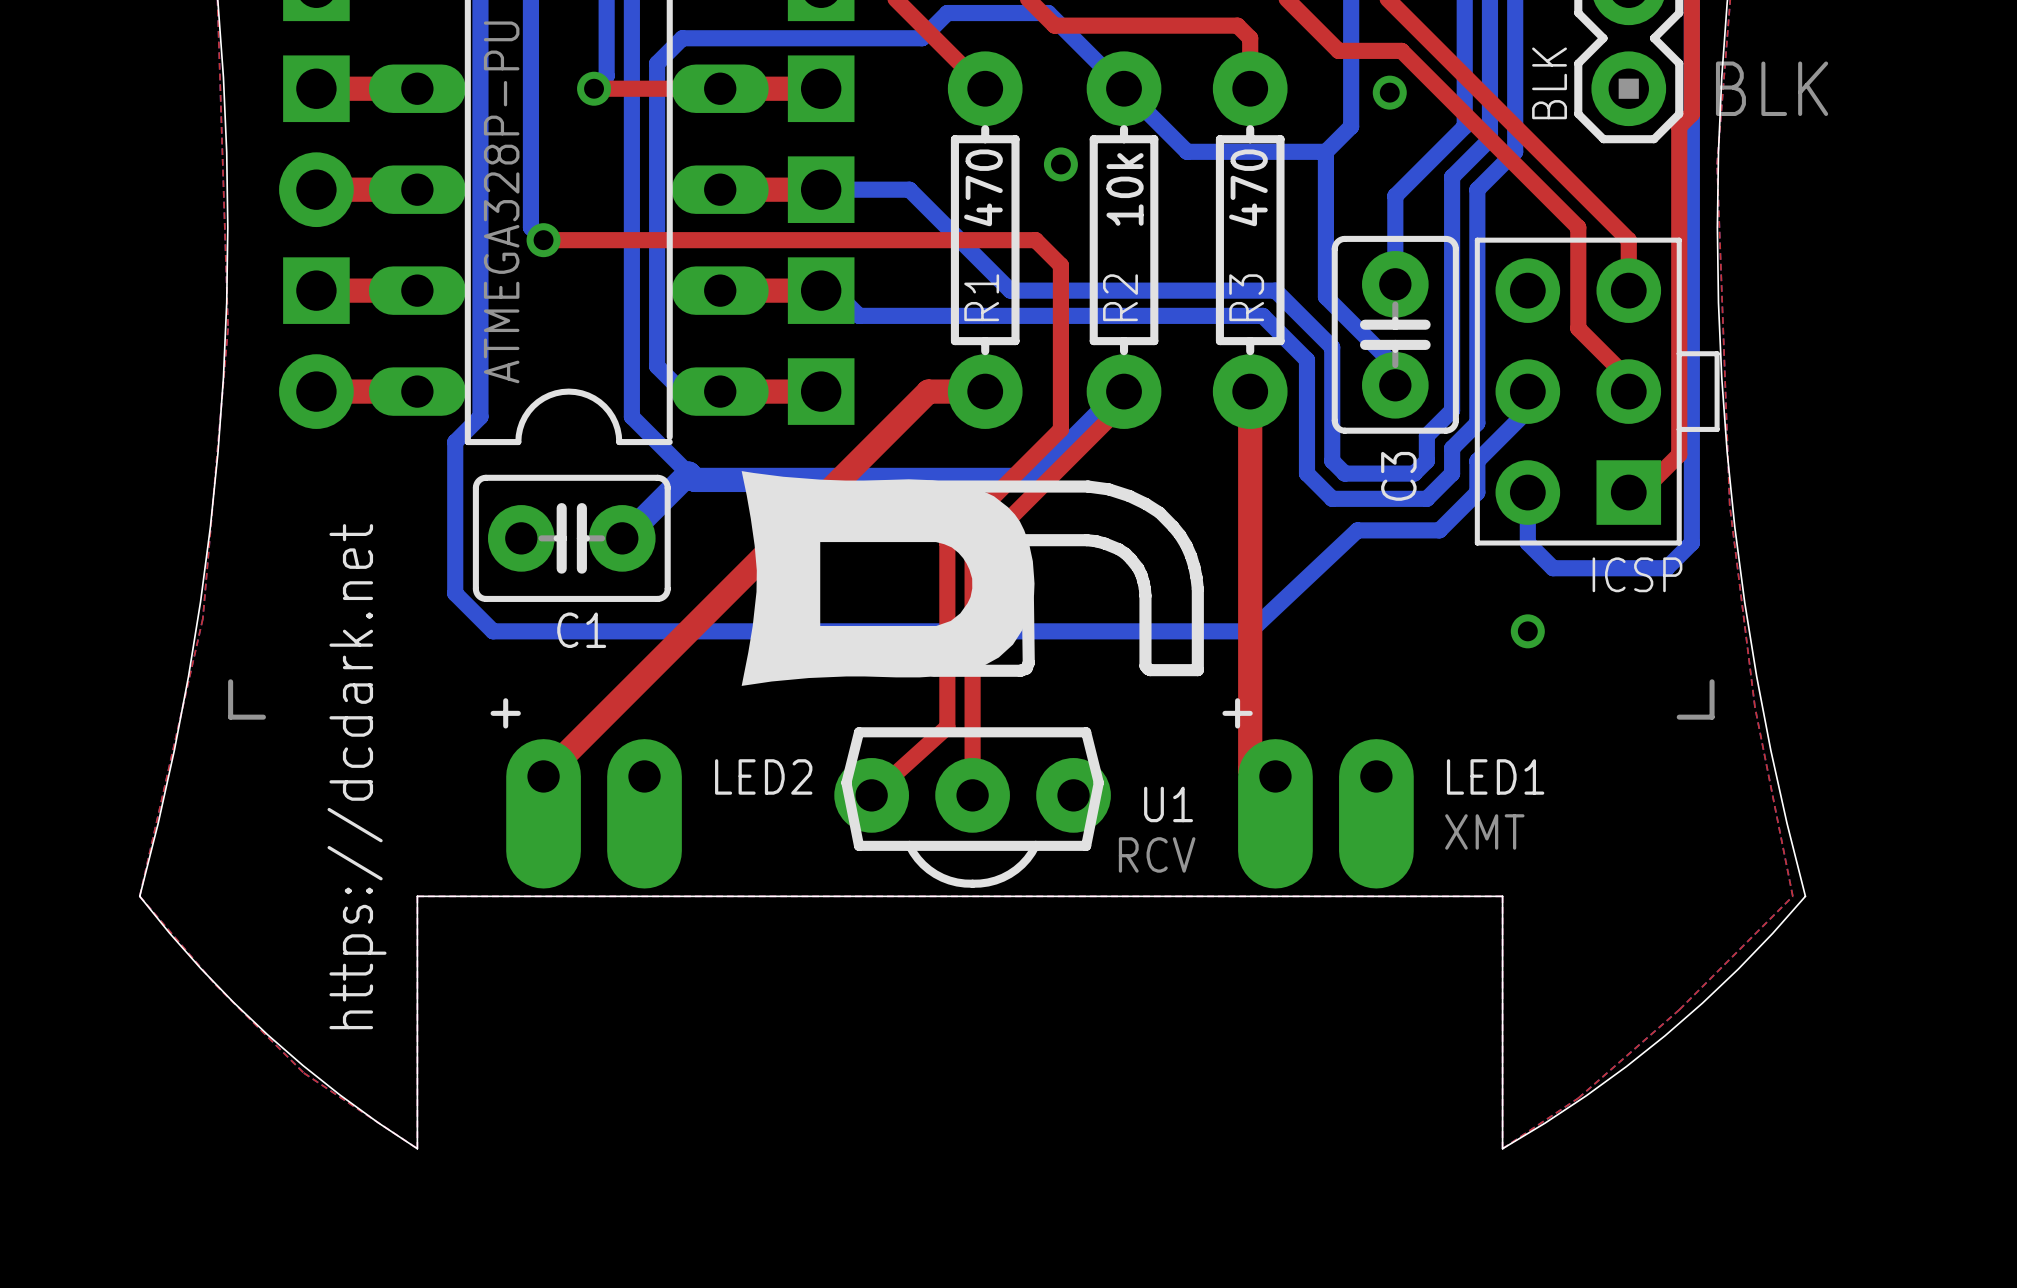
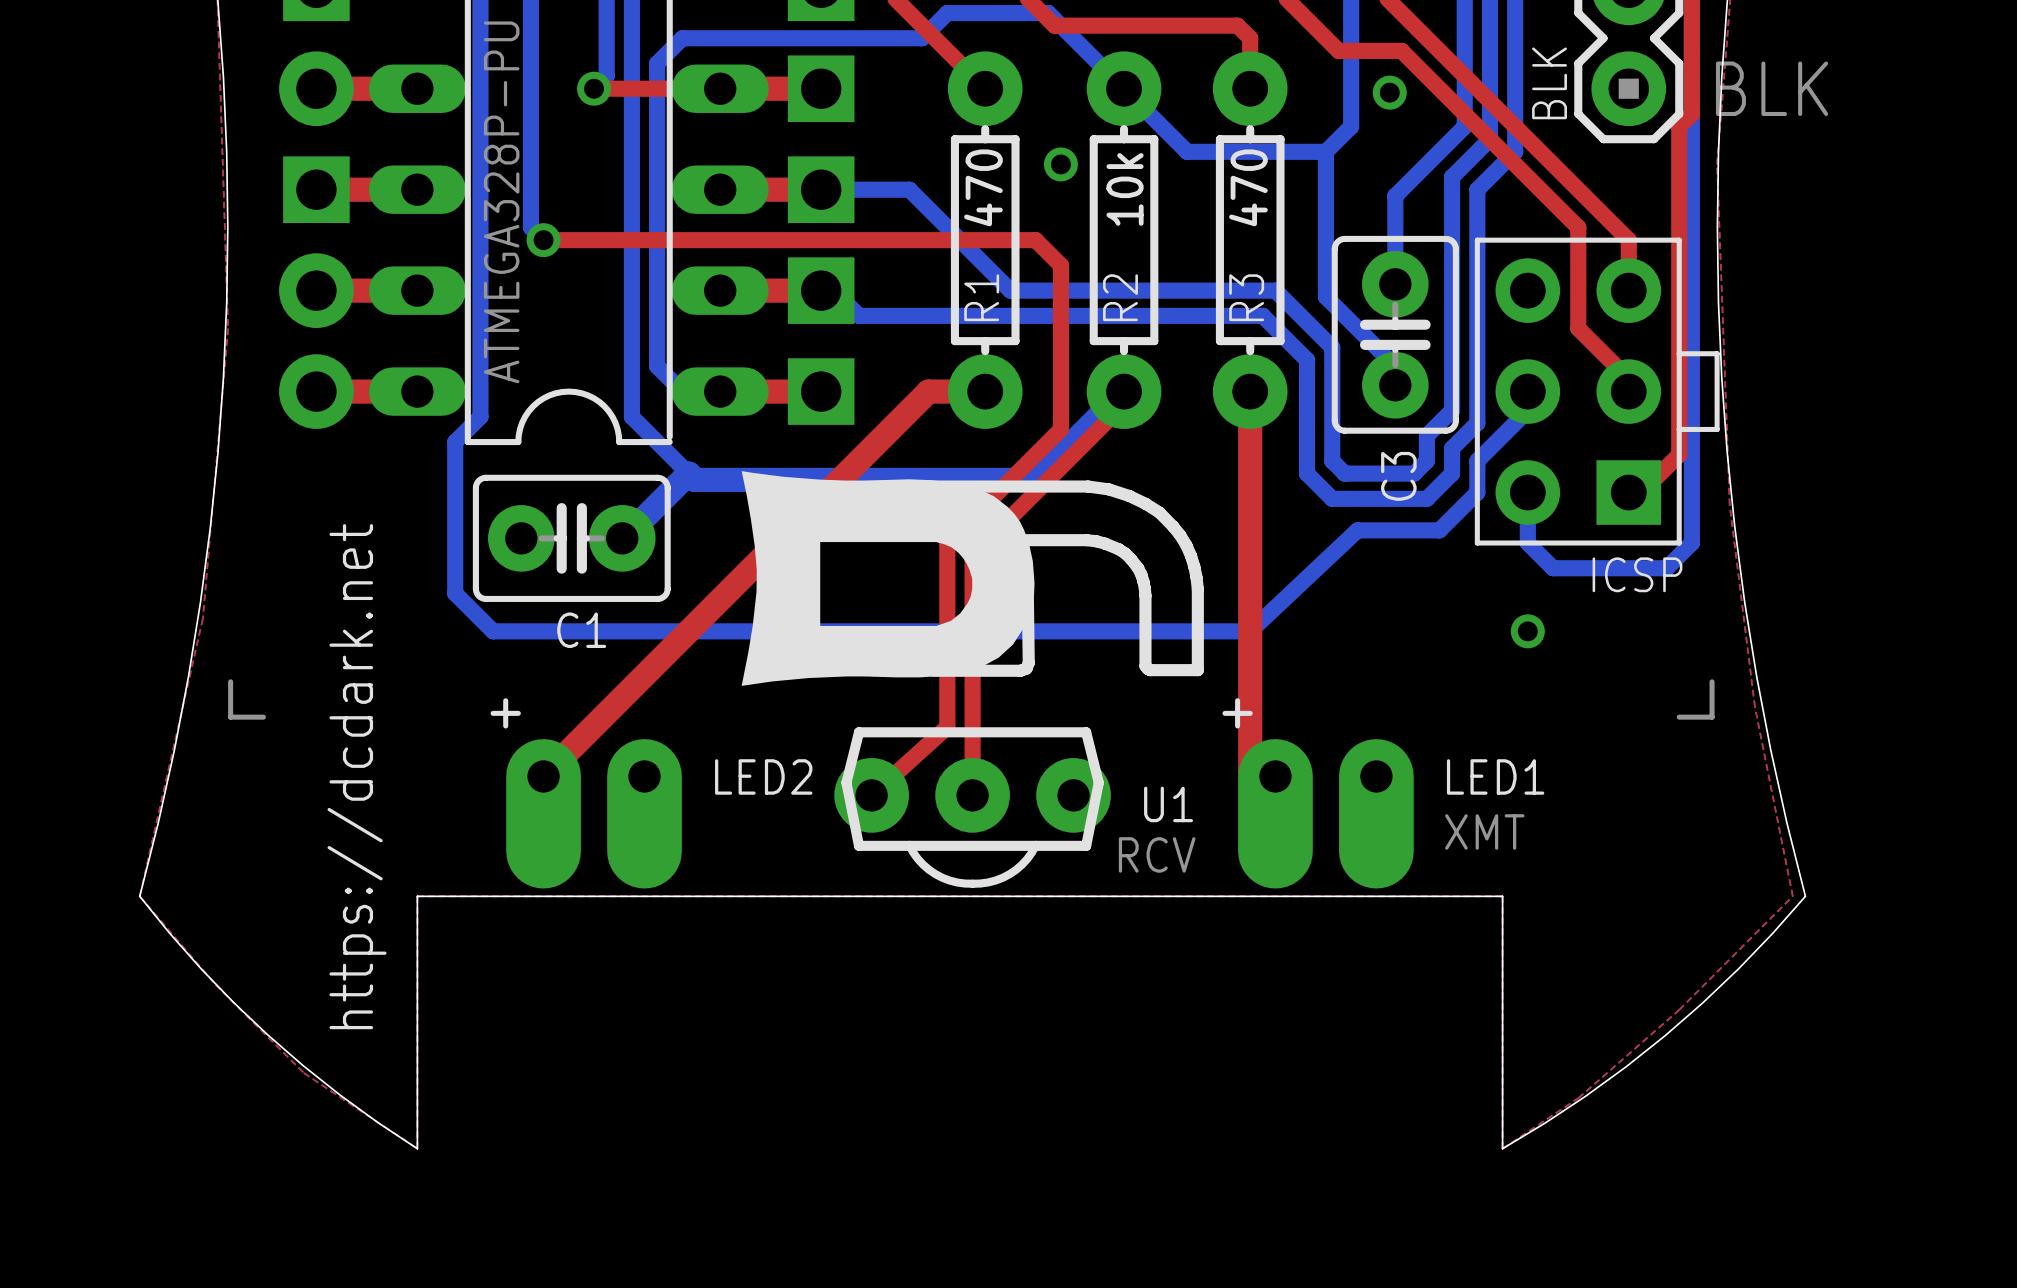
part footprint: [283, 55, 350, 123] -> [279, 51, 354, 127]
part footprint: [279, 152, 354, 228] -> [283, 156, 350, 224]
part footprint: [283, 257, 350, 324] -> [279, 253, 354, 328]

